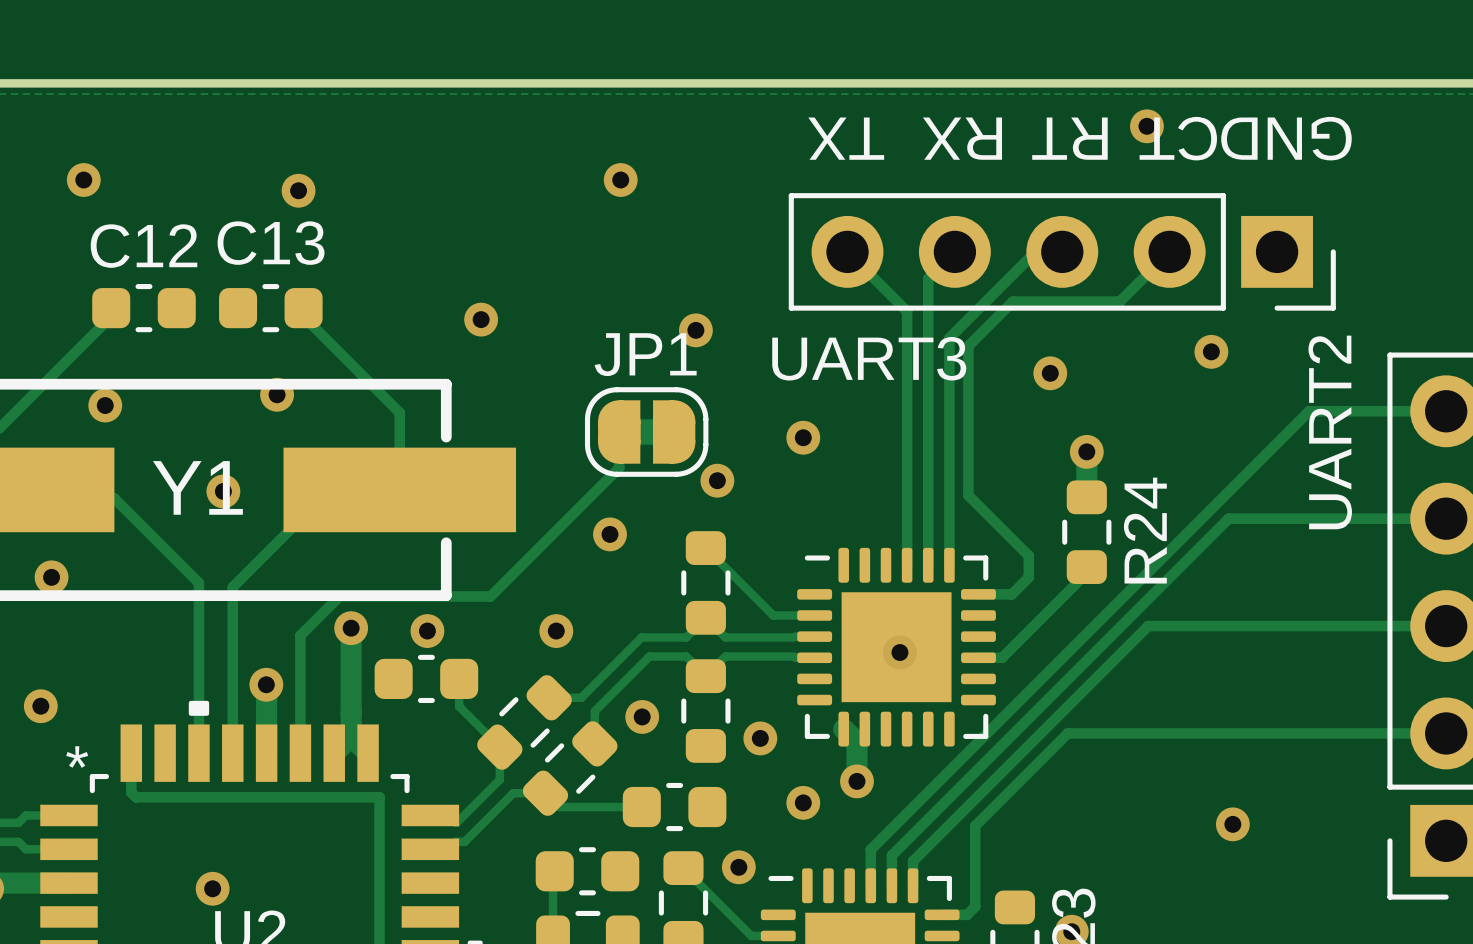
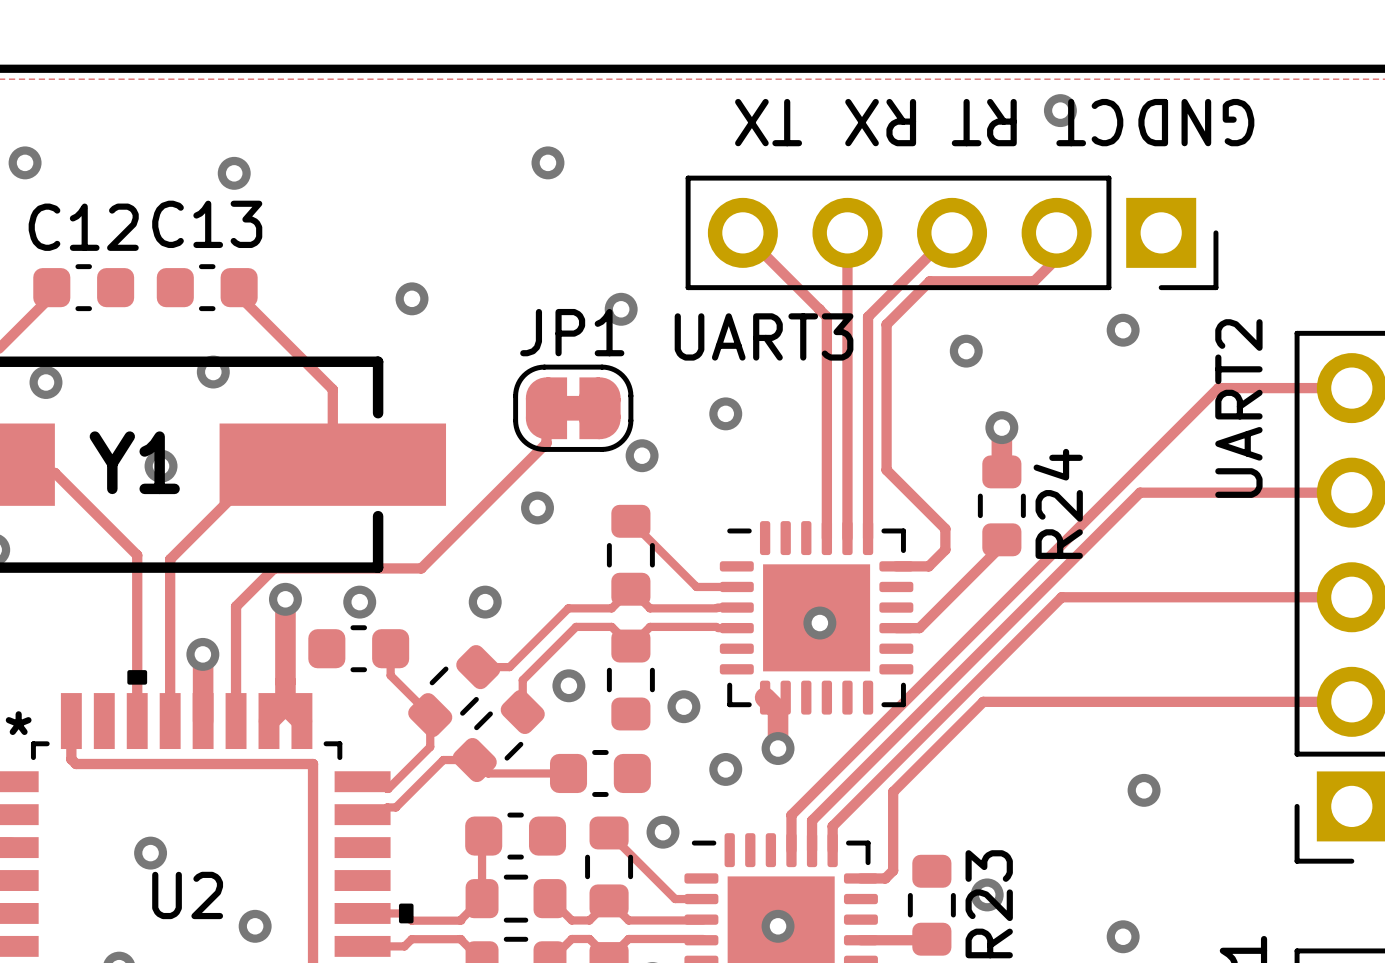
track: (847, 251) (907, 311) (907, 338) -> (742, 232) (826, 316)
part position: (1062, 251) -> (952, 232)

